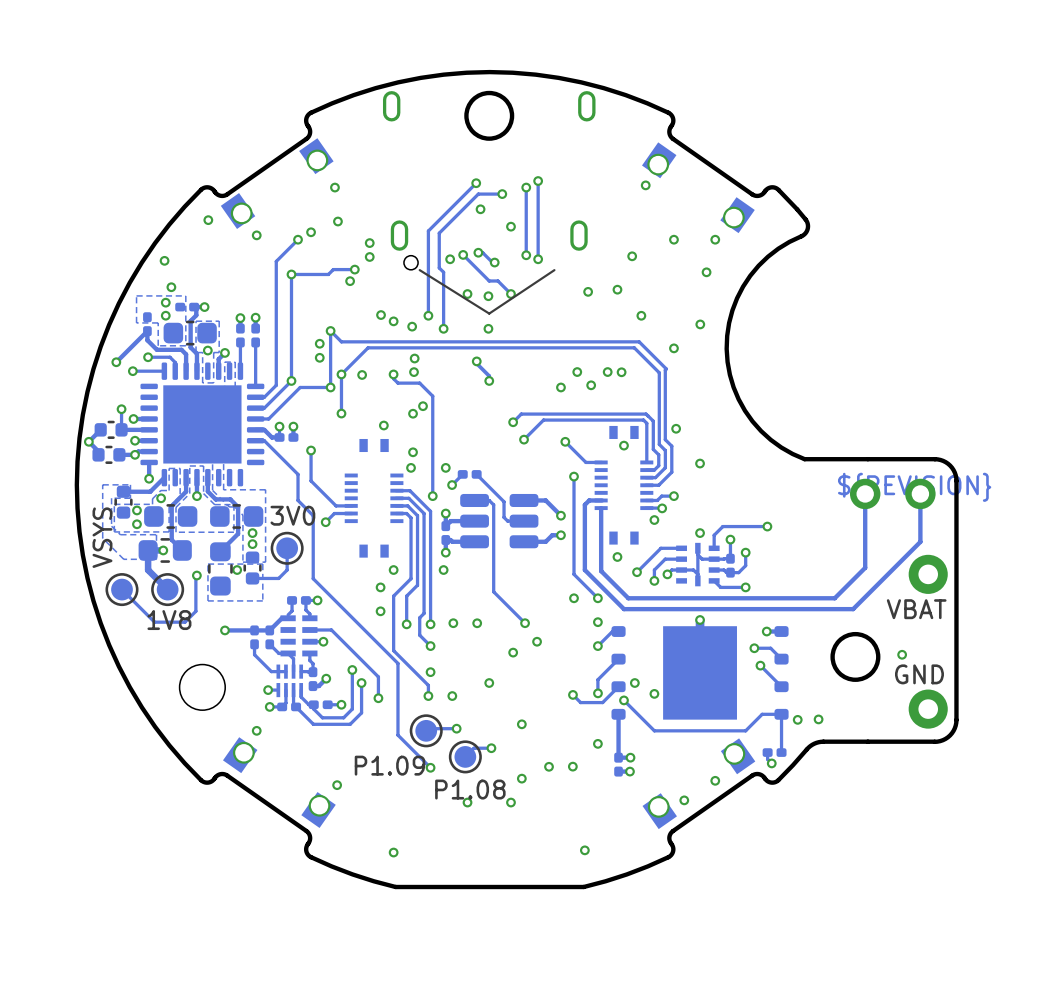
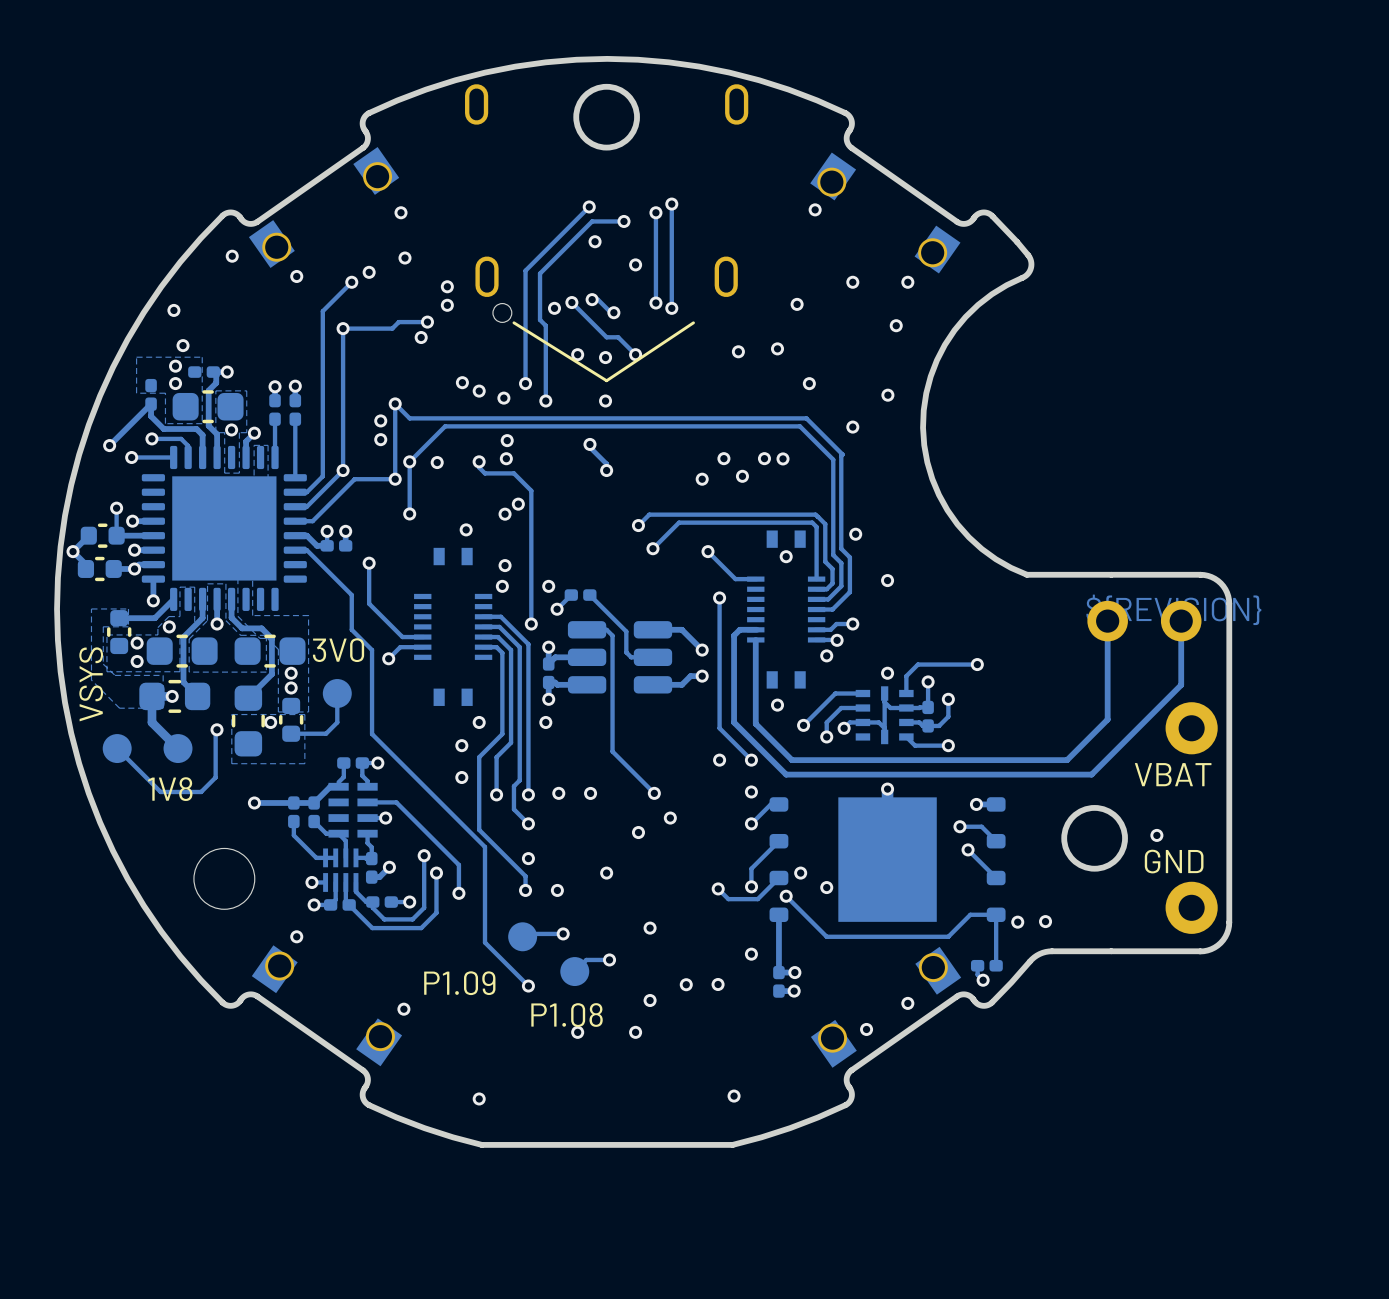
part footprint: [270, 531, 304, 565] -> [322, 679, 352, 709]
part footprint: [105, 573, 139, 607] -> [102, 734, 132, 764]
part footprint: [151, 573, 185, 607] -> [163, 734, 193, 764]
part footprint: [409, 714, 443, 748] -> [508, 922, 538, 952]
part footprint: [448, 740, 482, 774] -> [560, 957, 590, 987]

